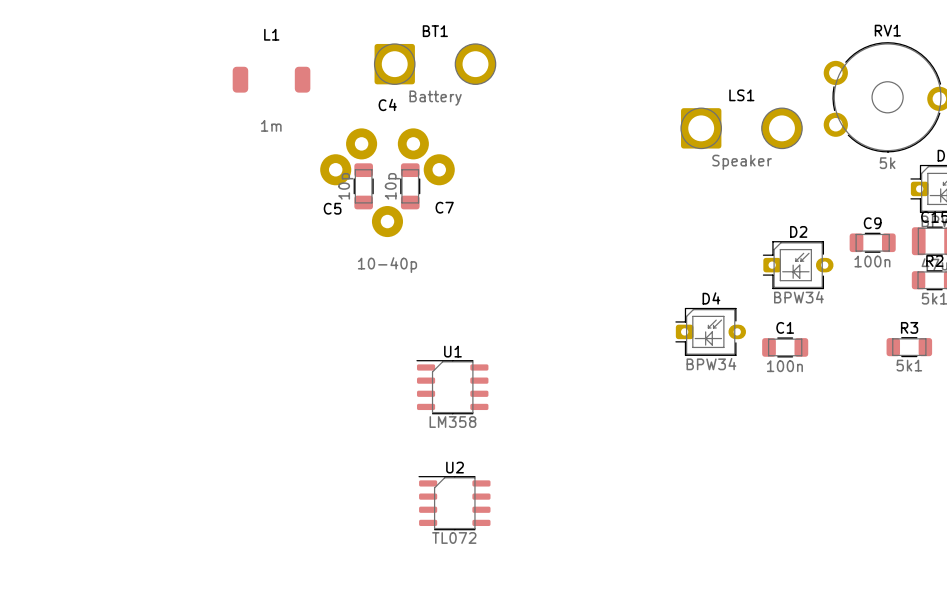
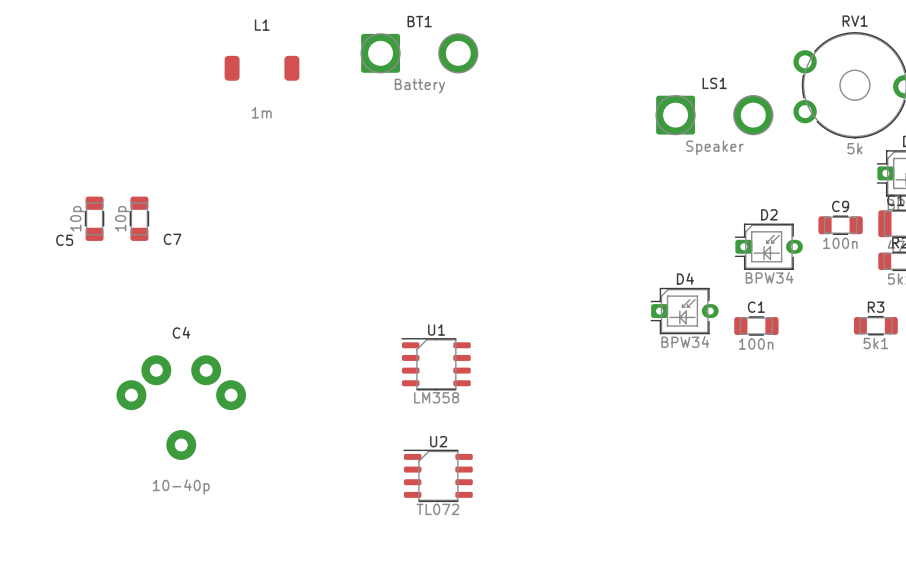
C4 position: (387, 182) -> (181, 407)
C5 position: (363, 186) -> (94, 218)
C7 position: (410, 186) -> (139, 218)

